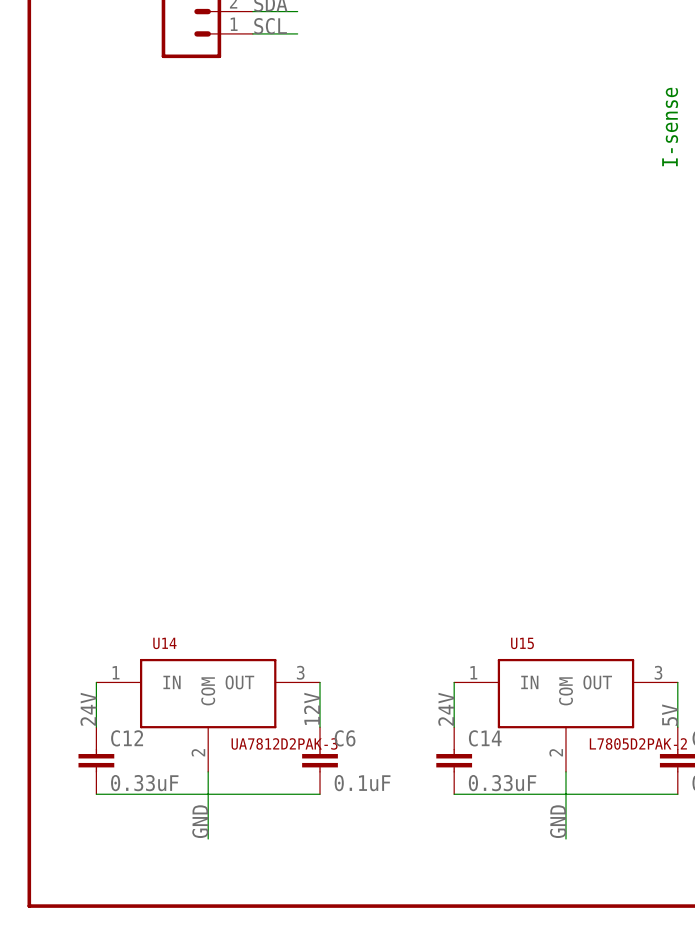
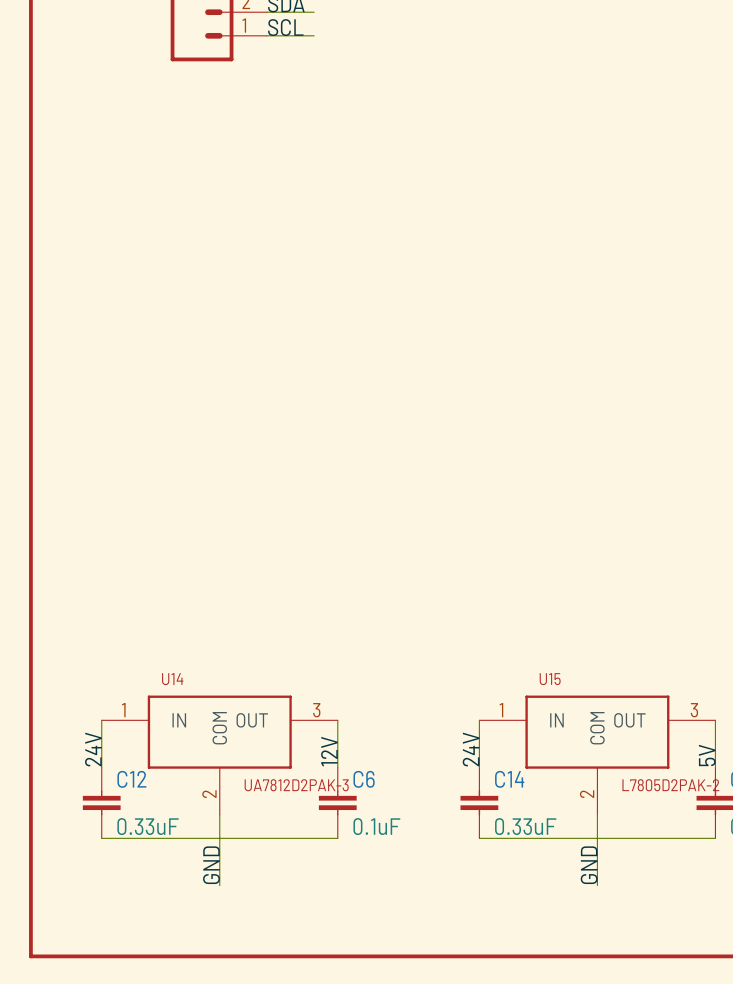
text: I-sense (670, 127) -> none

